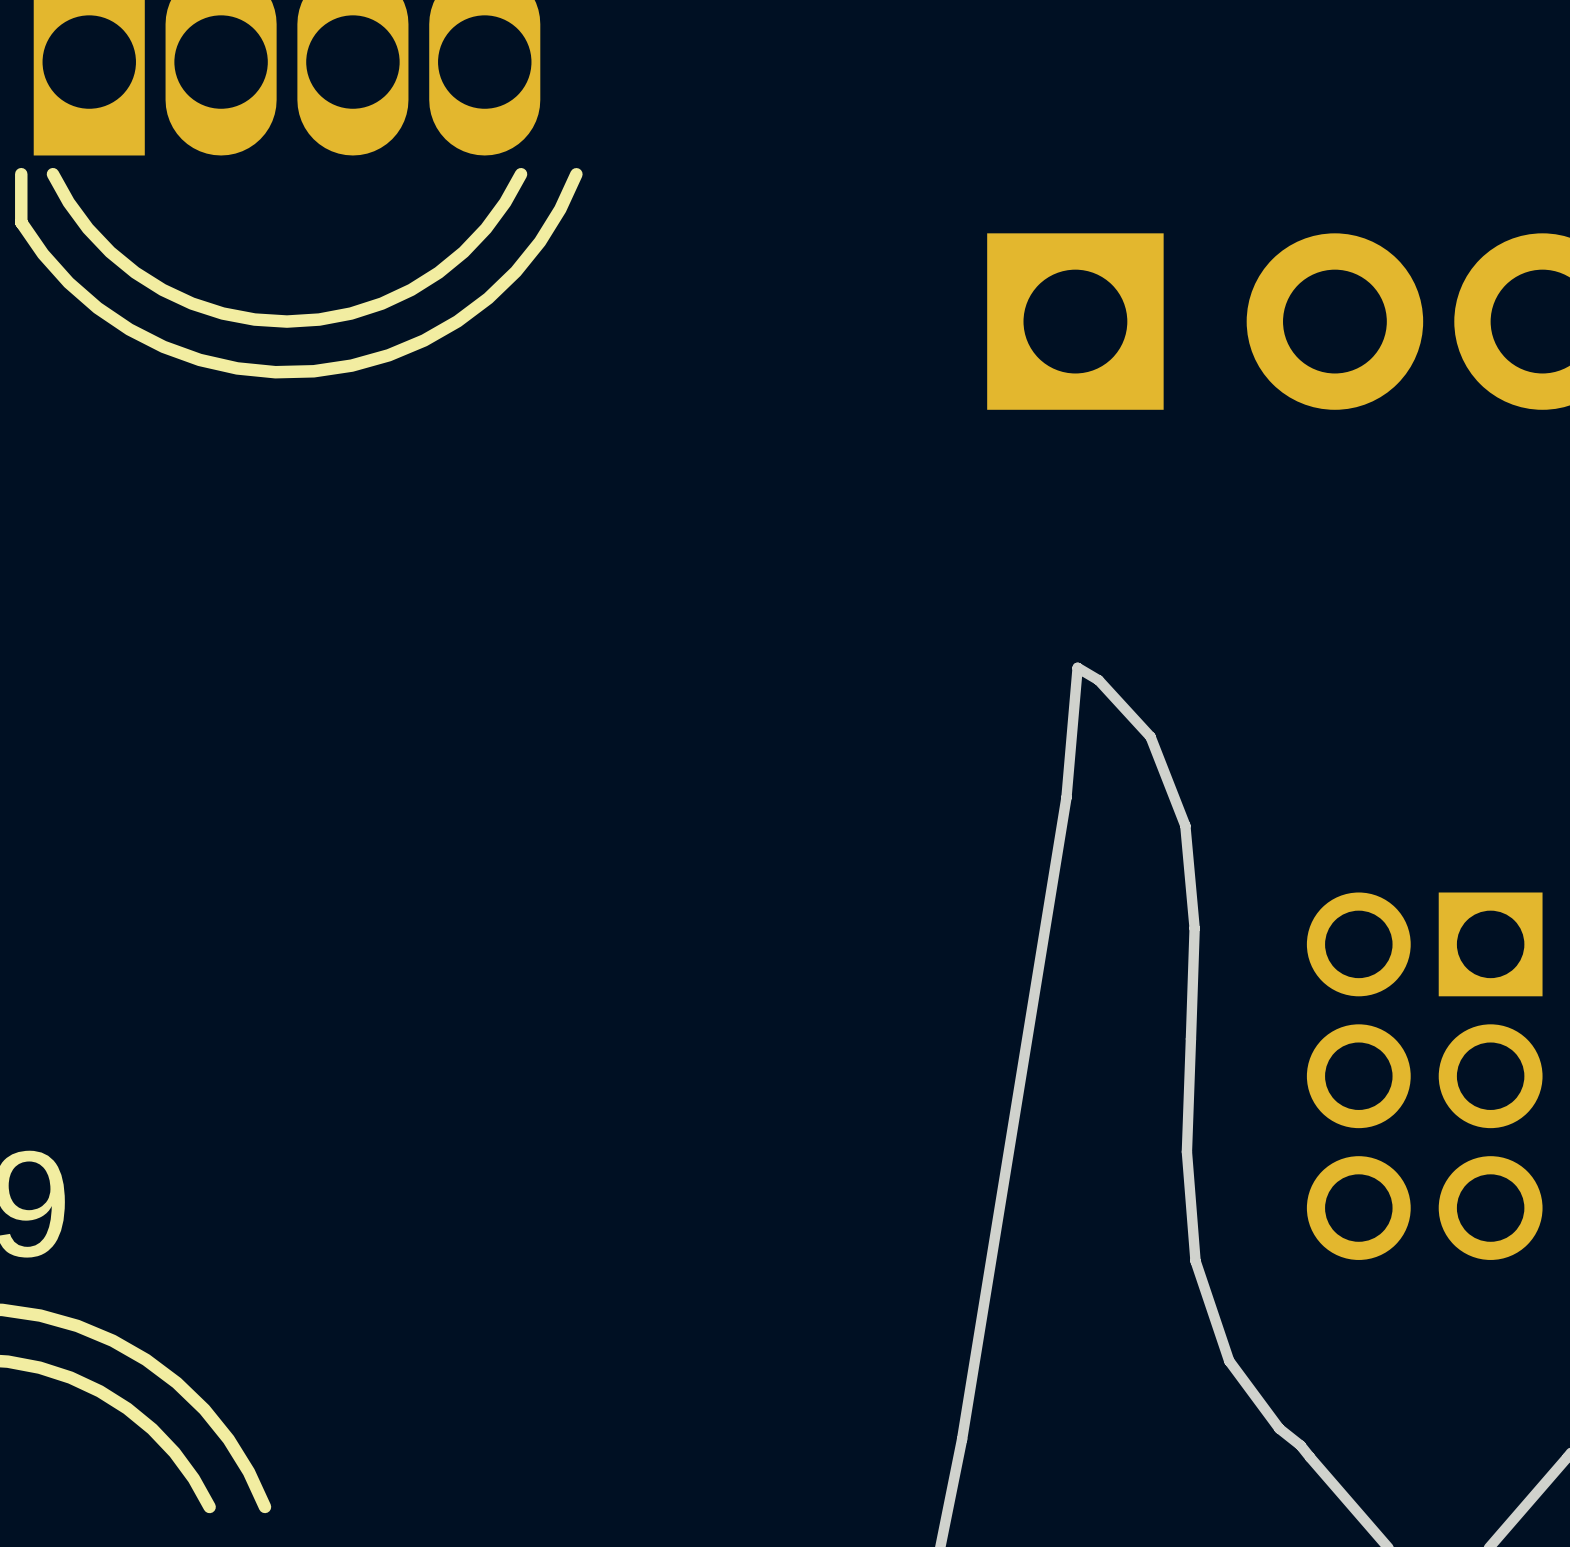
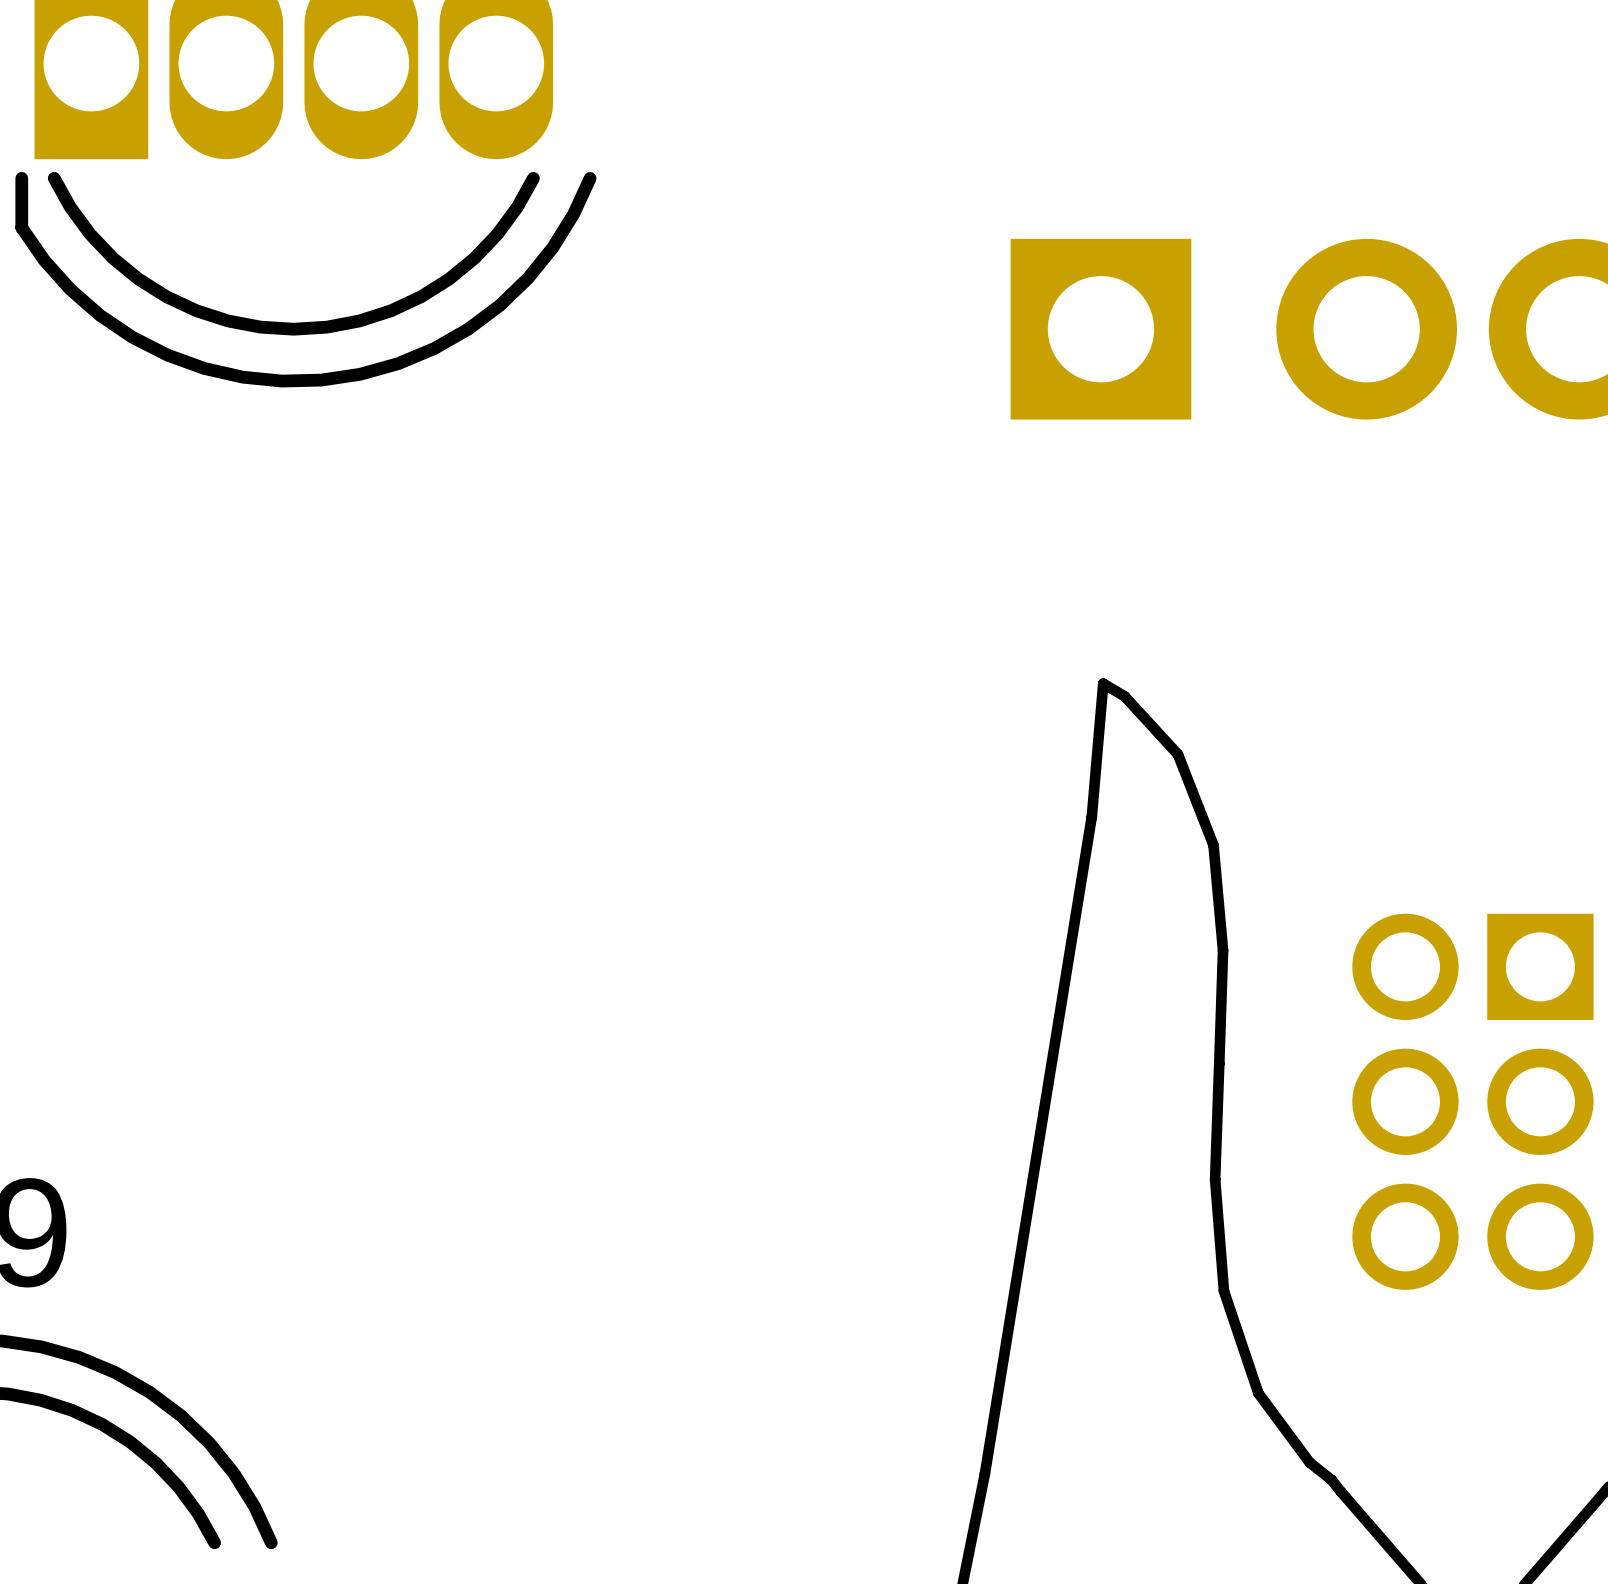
part position: (1424, 1076) -> (1472, 1101)

